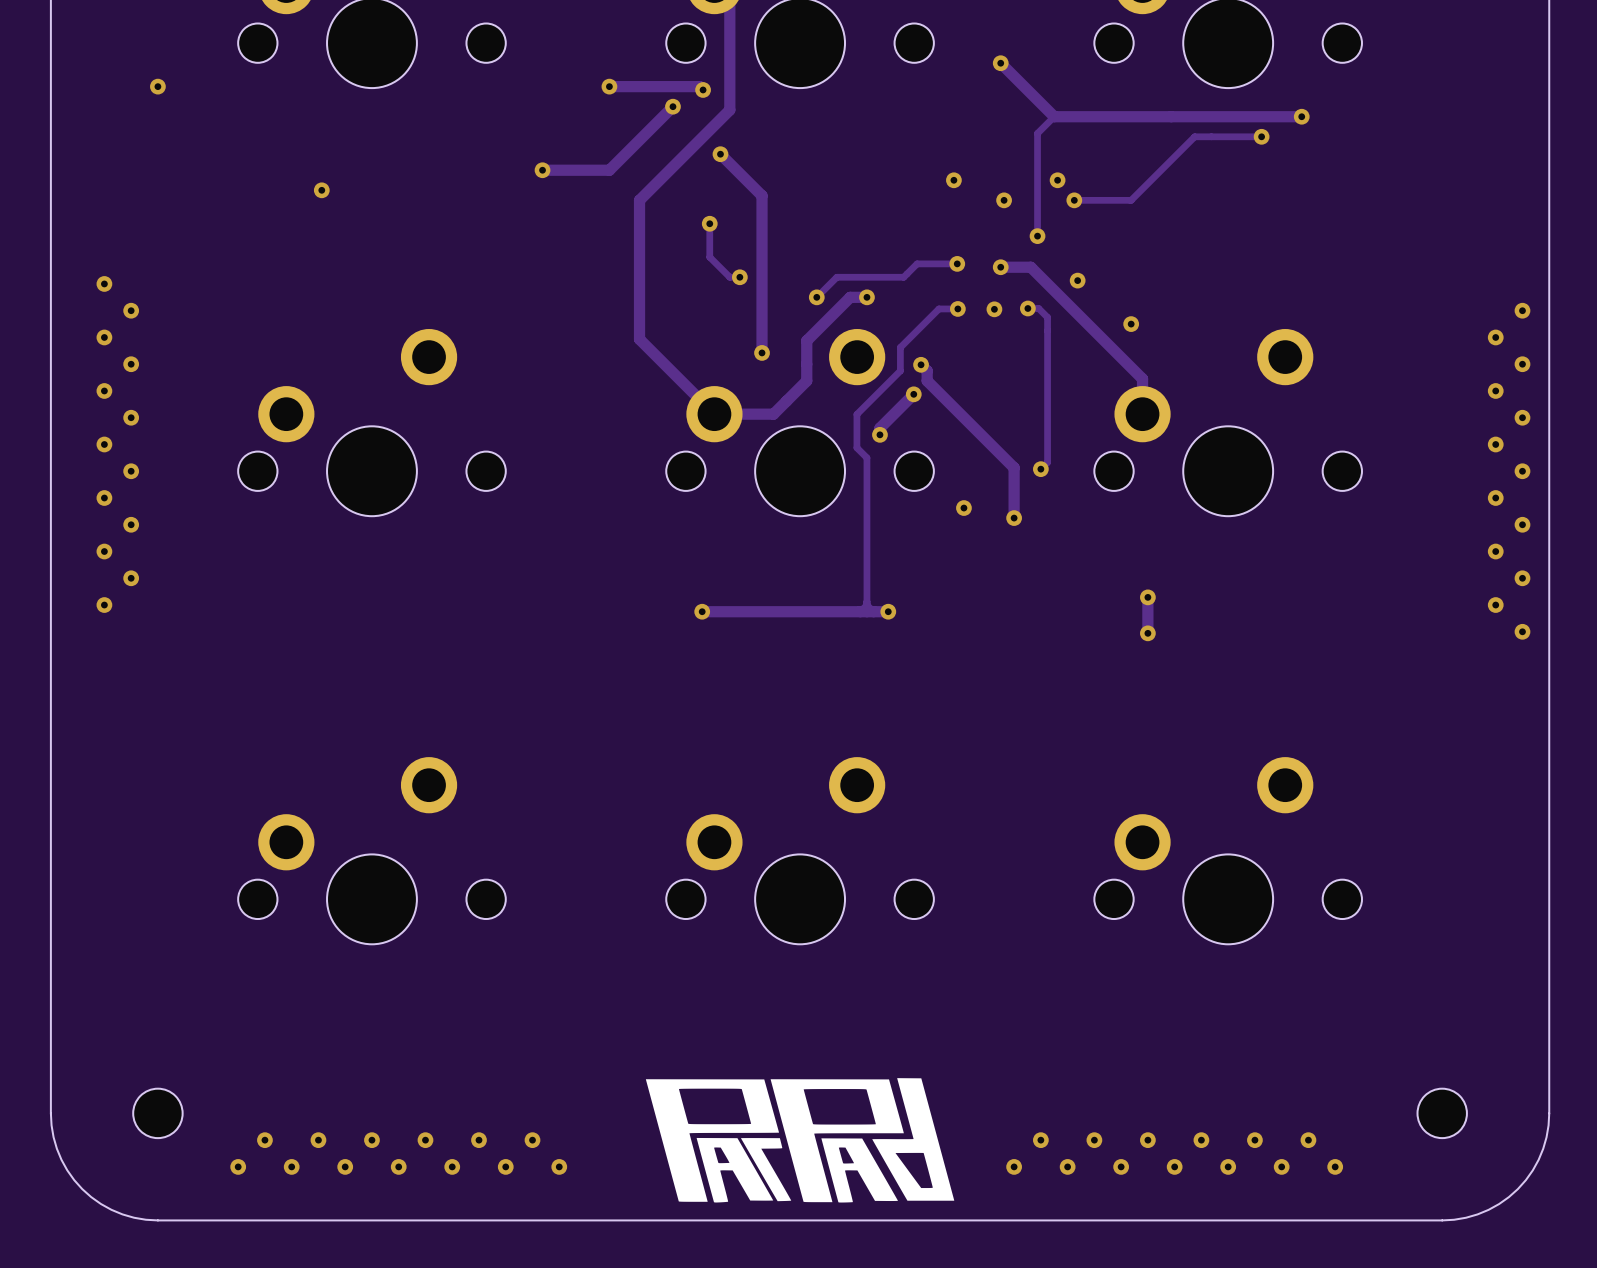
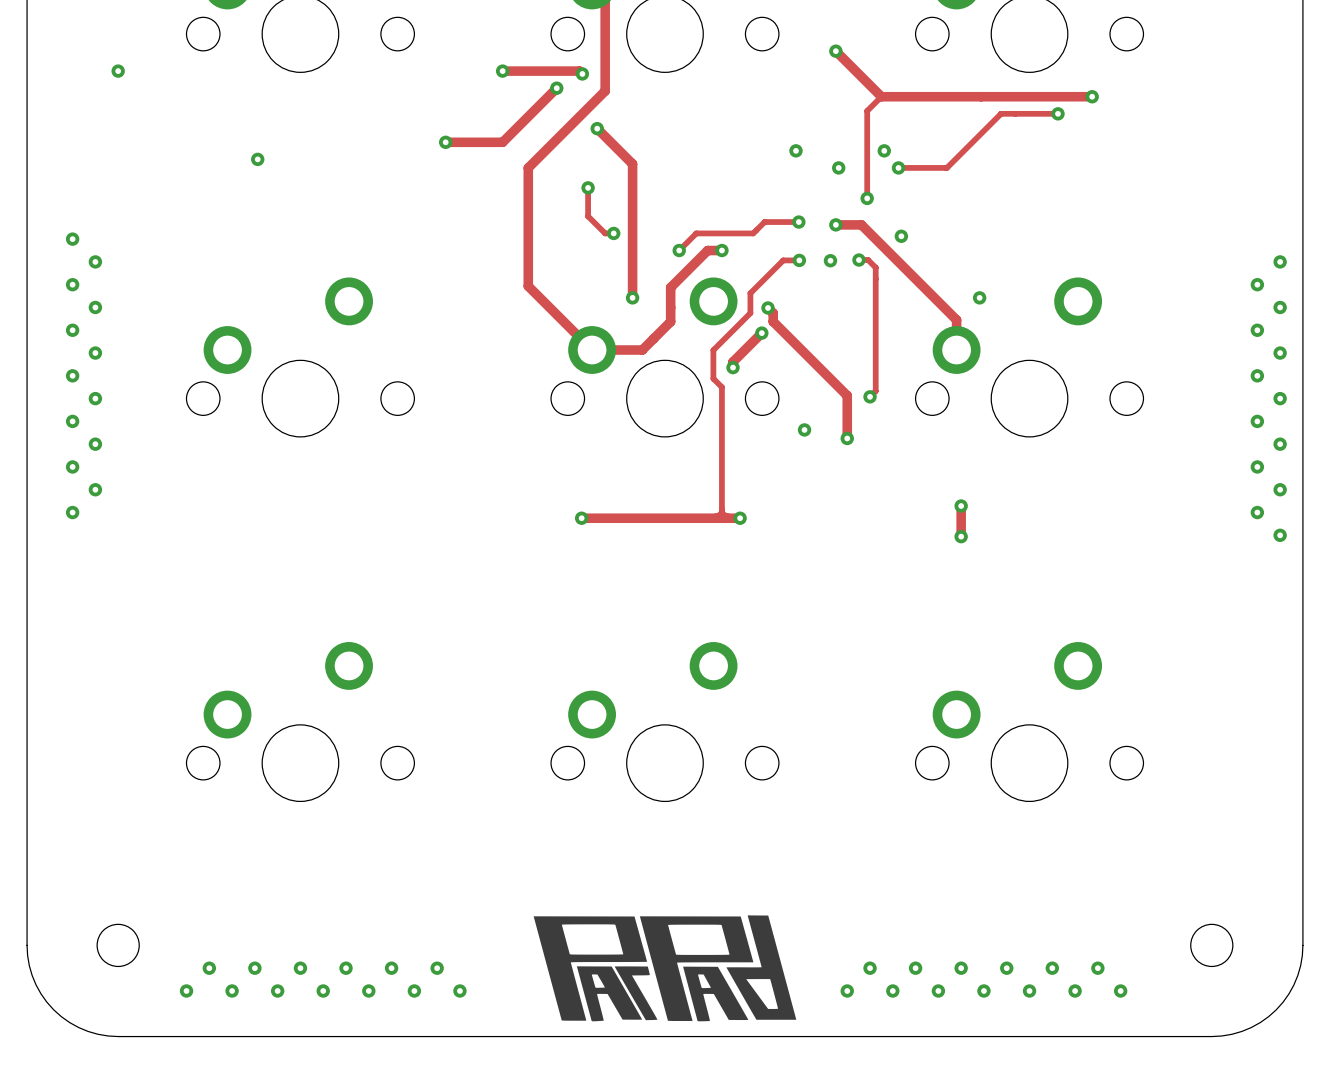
via position: (1131, 324) -> (979, 297)

